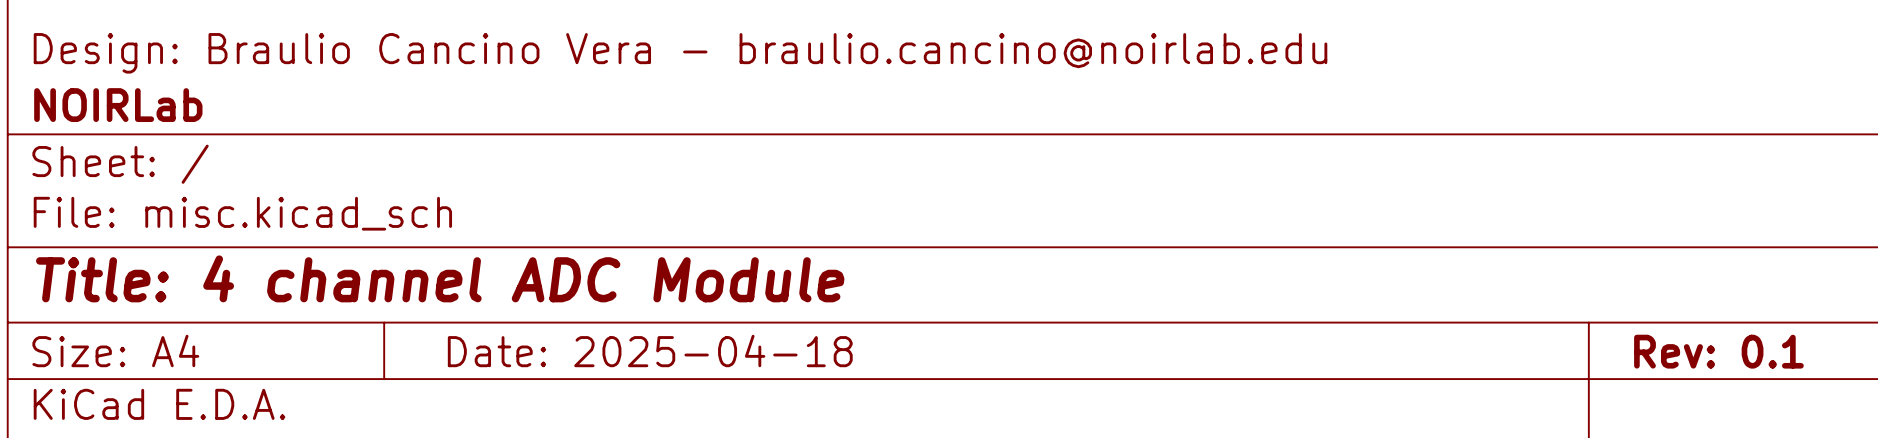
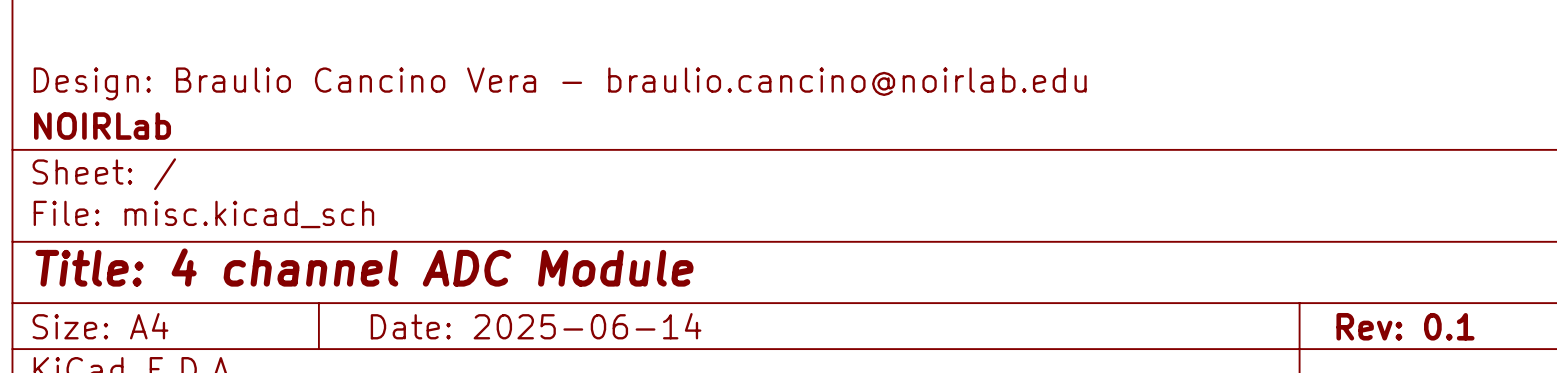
title block: Date: 2025-04-18 (650, 350) -> Date: 2025-06-14 (536, 326)

